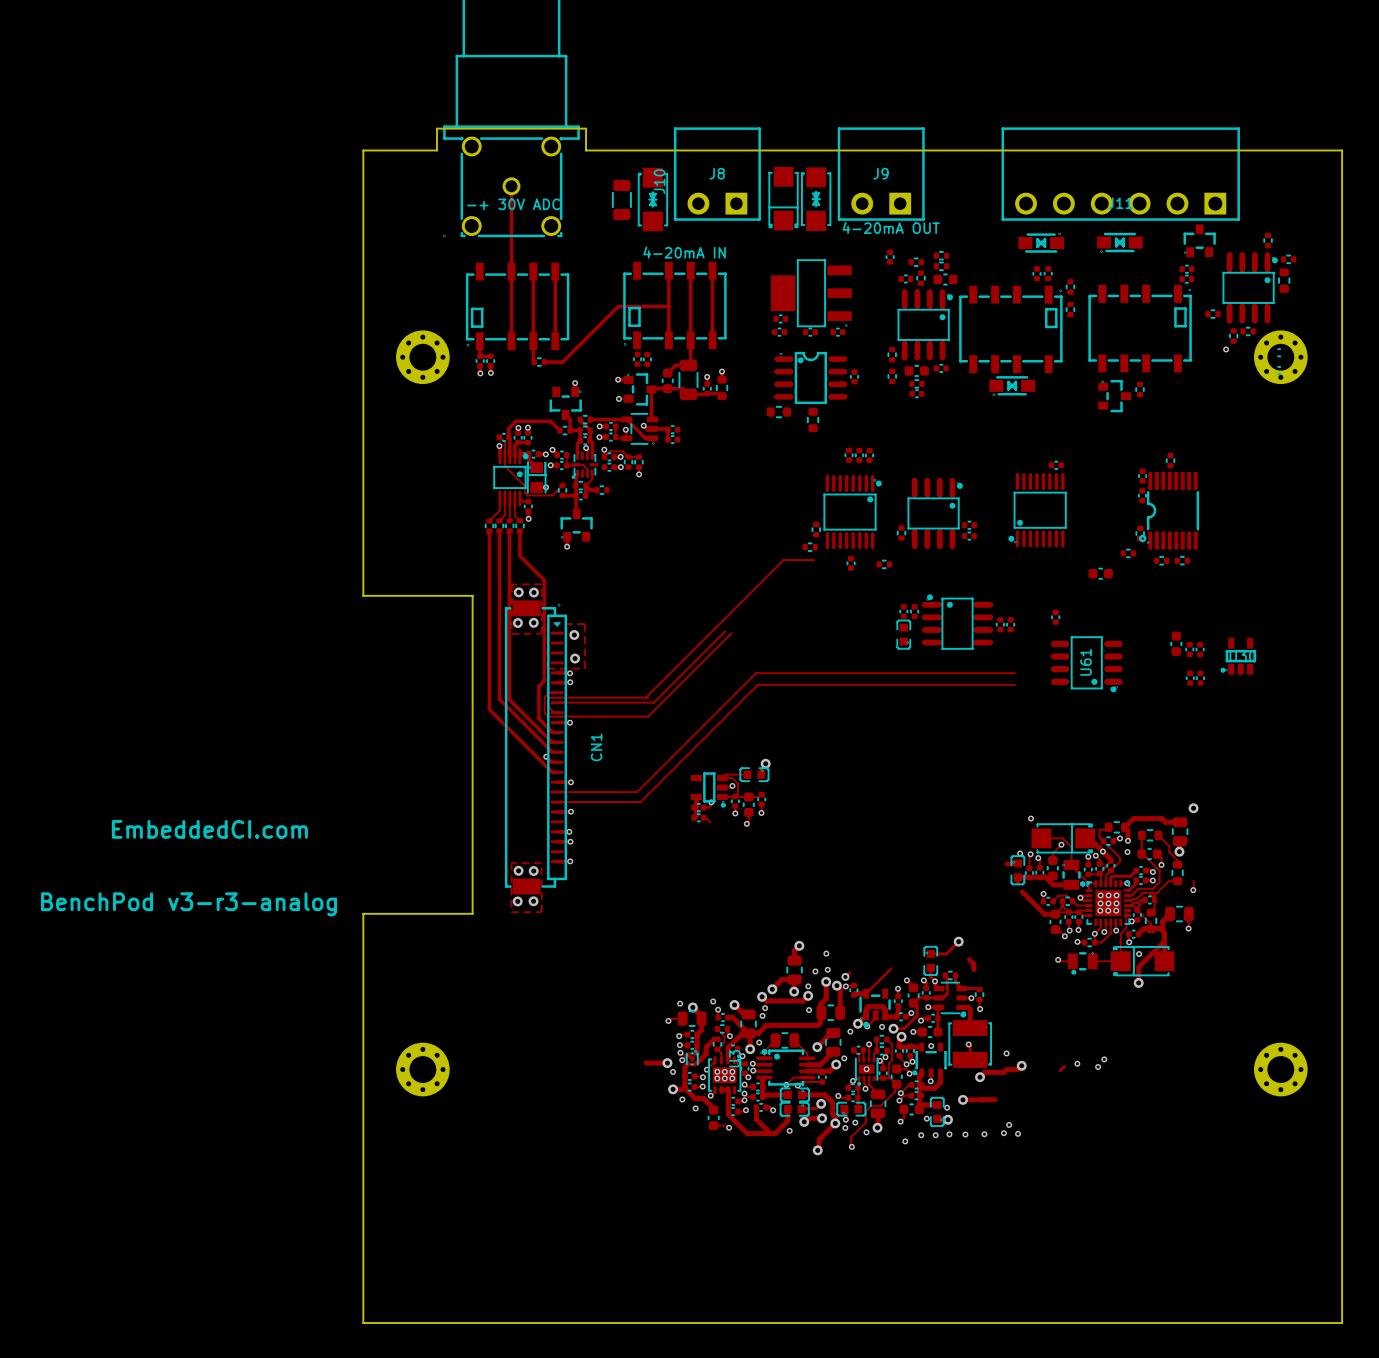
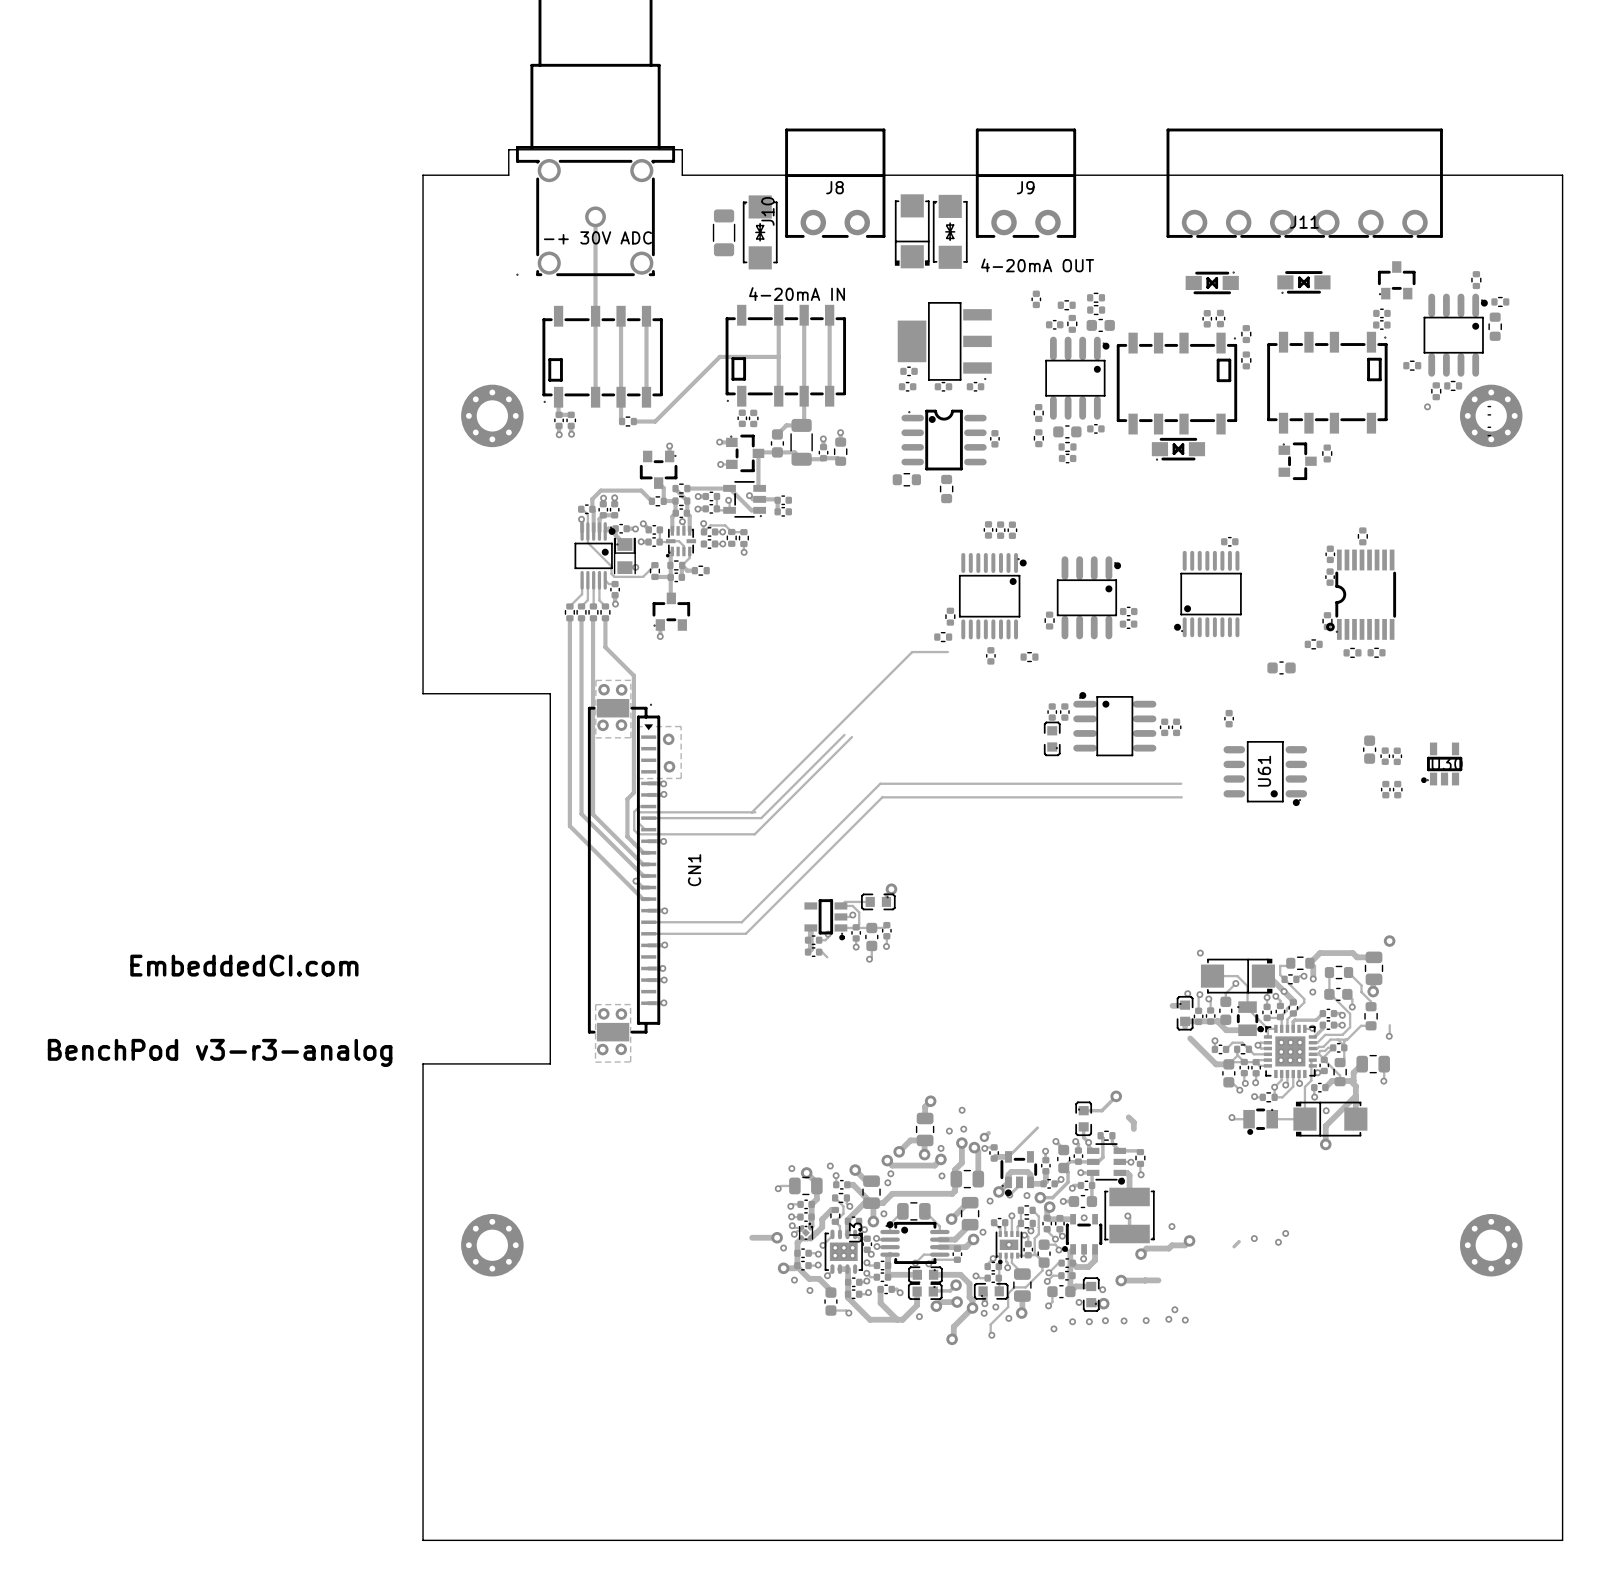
J8 footprint: [673, 127, 761, 221] -> [785, 128, 886, 238]
J9 footprint: [837, 127, 925, 221] -> [975, 128, 1077, 238]
J11 footprint: [1001, 127, 1240, 221] -> [1166, 128, 1443, 238]

